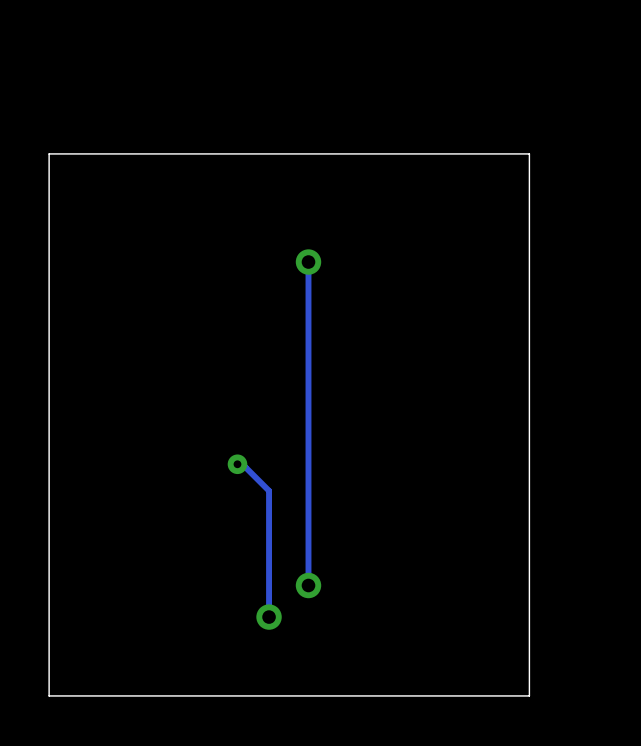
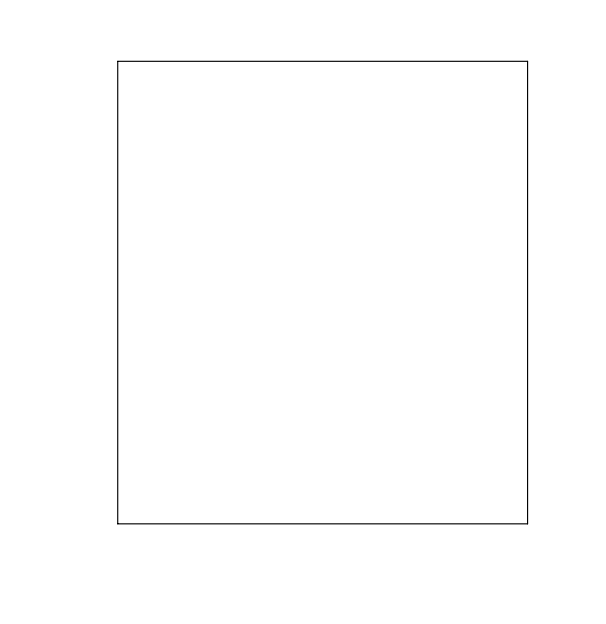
track: (308, 262) (308, 585) -> none
via: (308, 262) -> none
track: (237, 464) (240, 467) (245, 467) (269, 490) (269, 617) -> none
via: (237, 464) -> none
via: (308, 585) -> none
via: (269, 617) -> none

